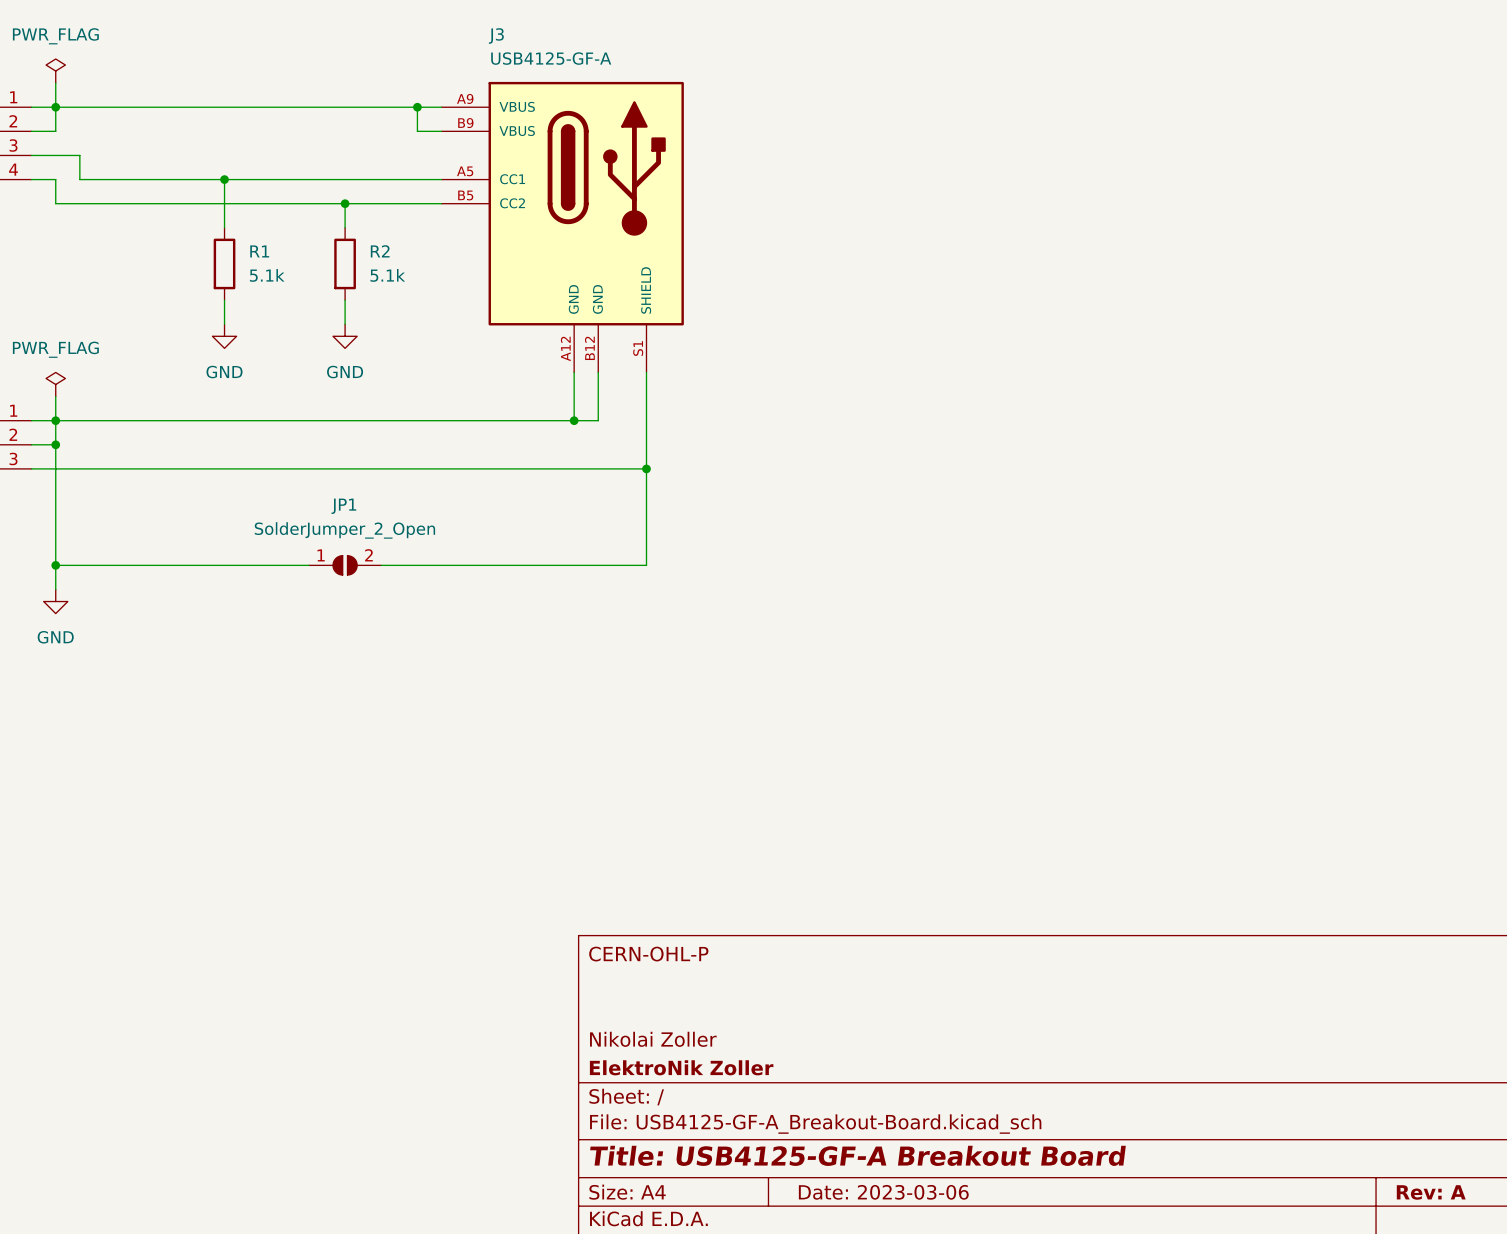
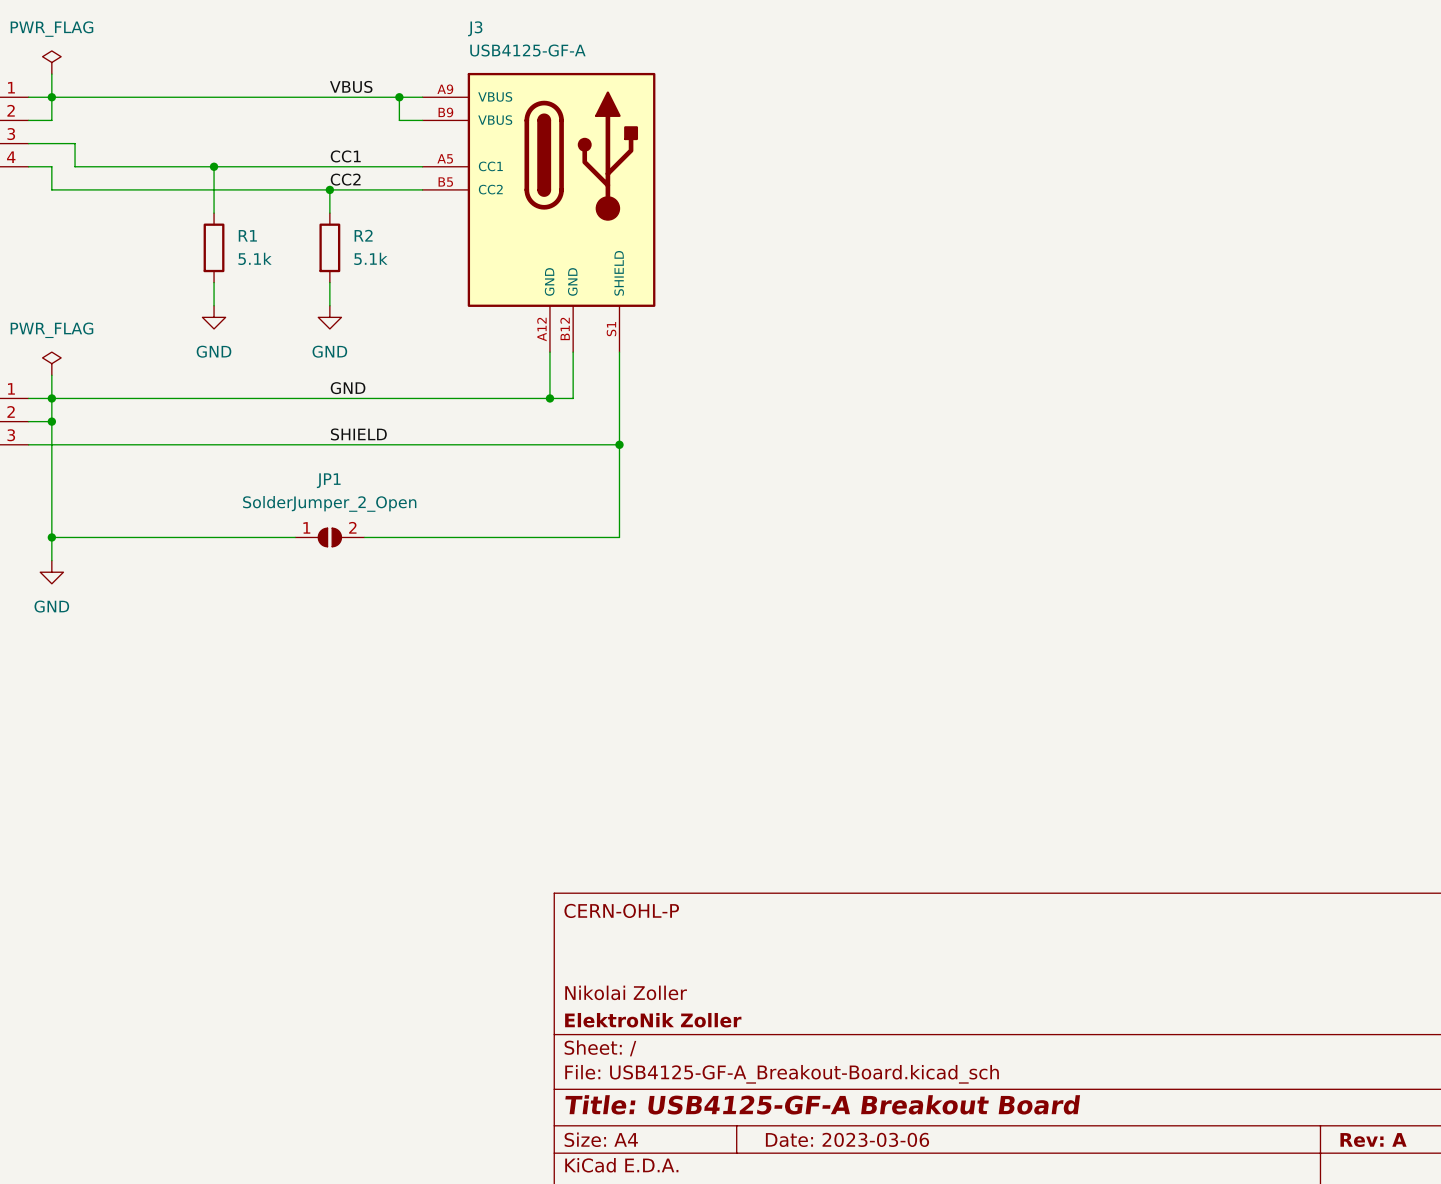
label: none -> VBUS (351, 86)
label: none -> CC1 (345, 156)
label: none -> CC2 (345, 179)
label: none -> GND (348, 388)
label: none -> SHIELD (358, 434)

